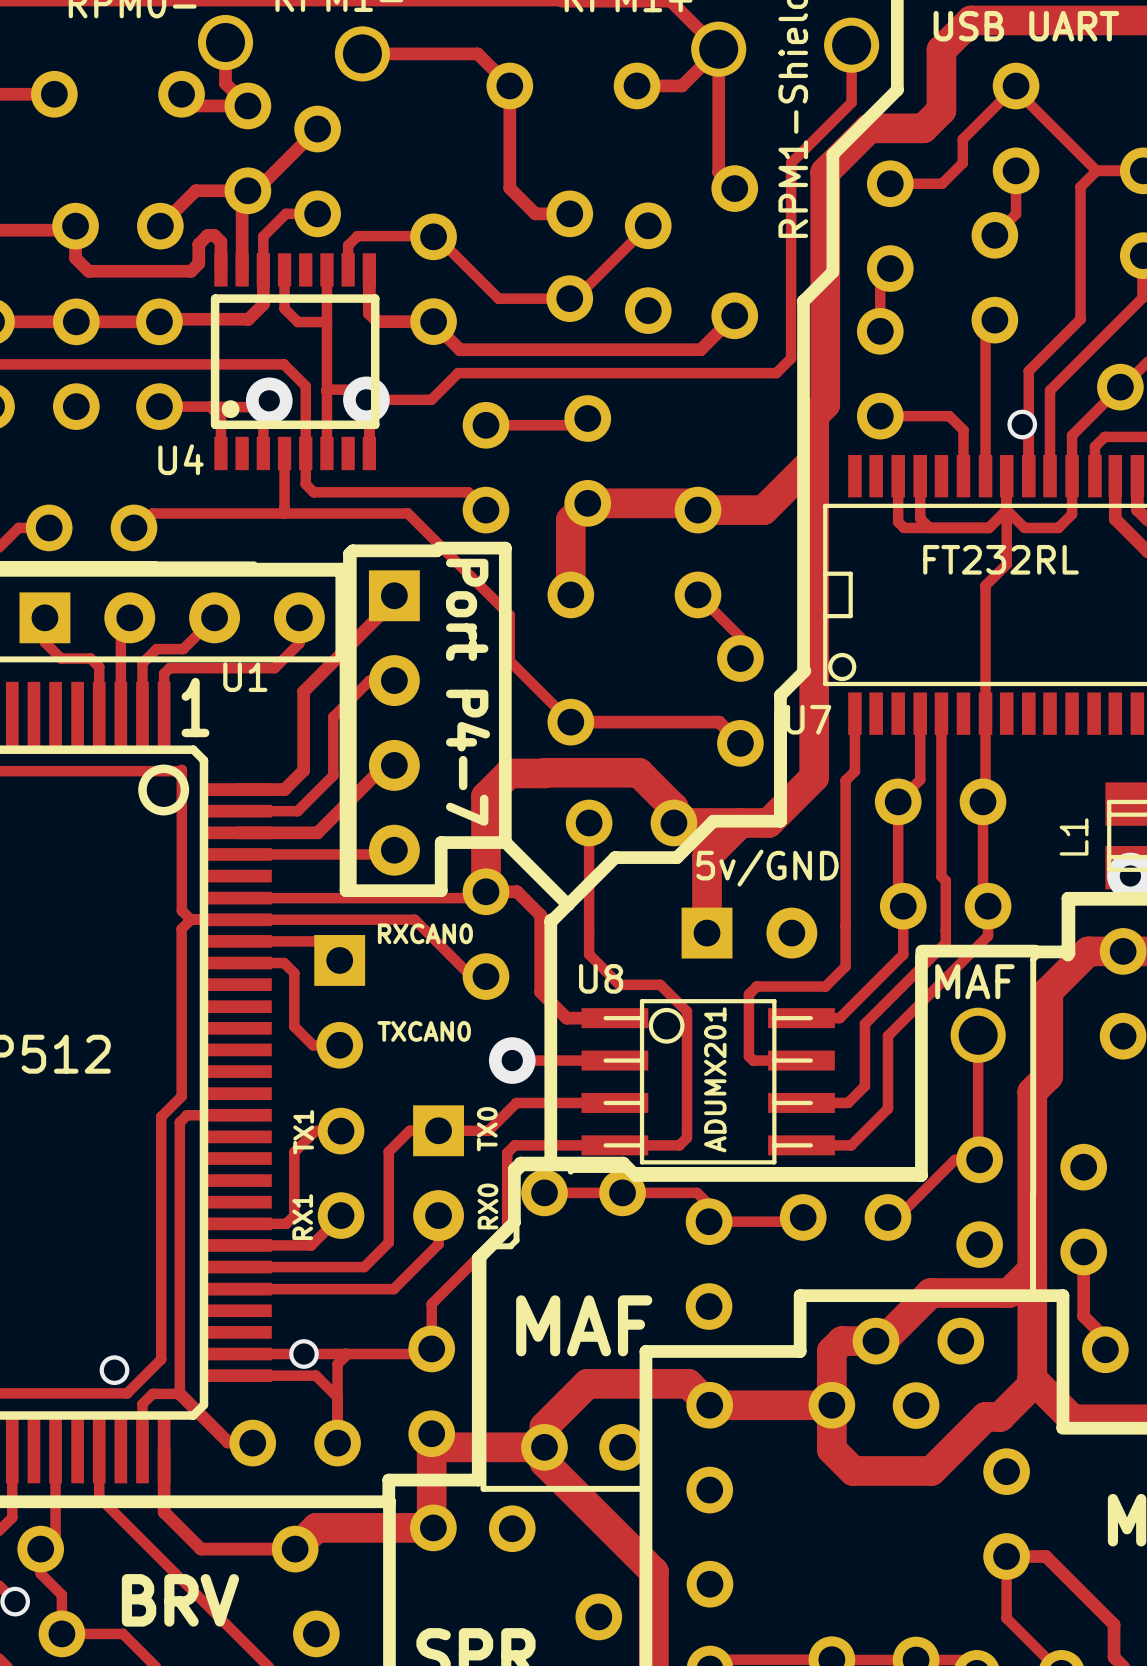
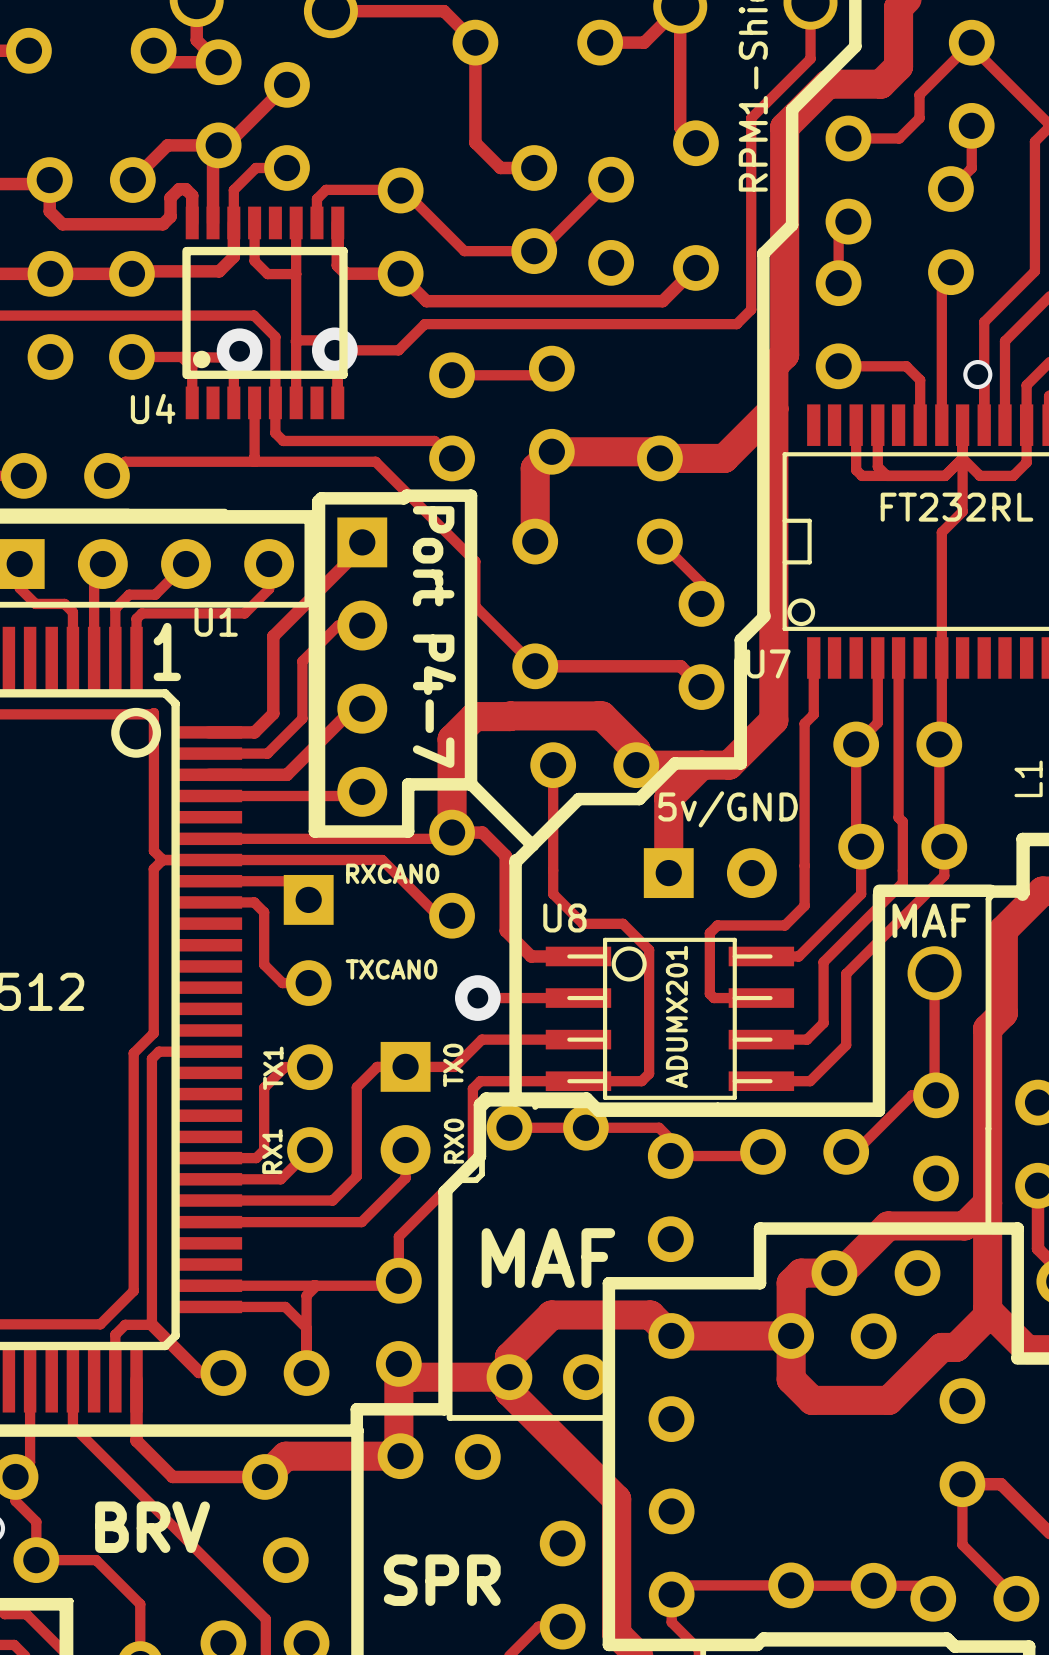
via: (303, 1354) -> none
via: (114, 1370) -> none

